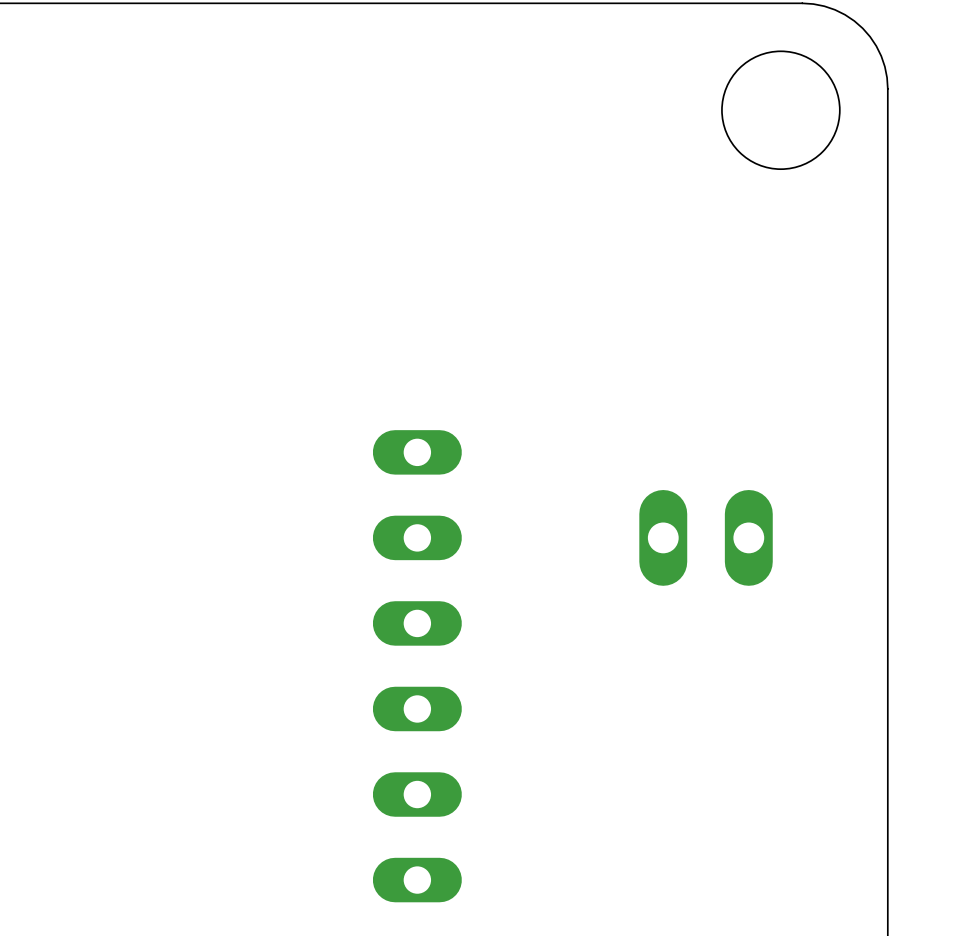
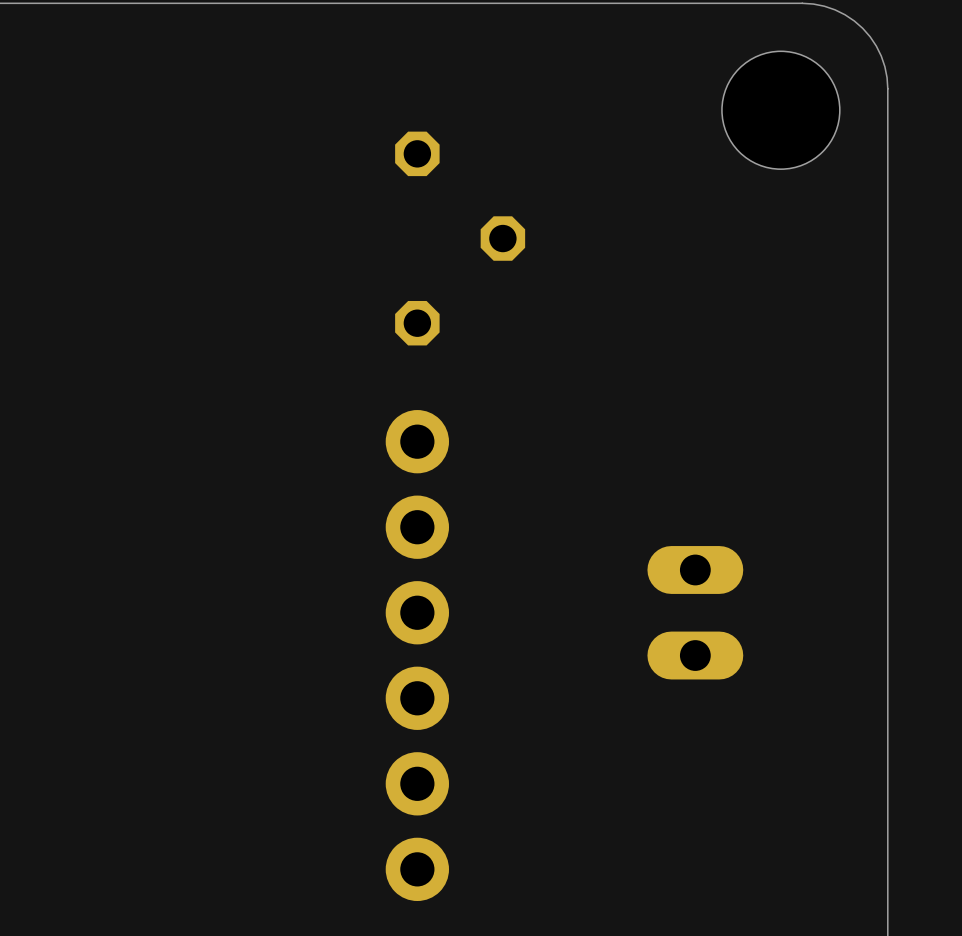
part: none -> (460, 238)
part footprint: [372, 430, 462, 903] -> [385, 410, 450, 902]
part rotation: 0° (706, 537) -> 90° clockwise (695, 612)

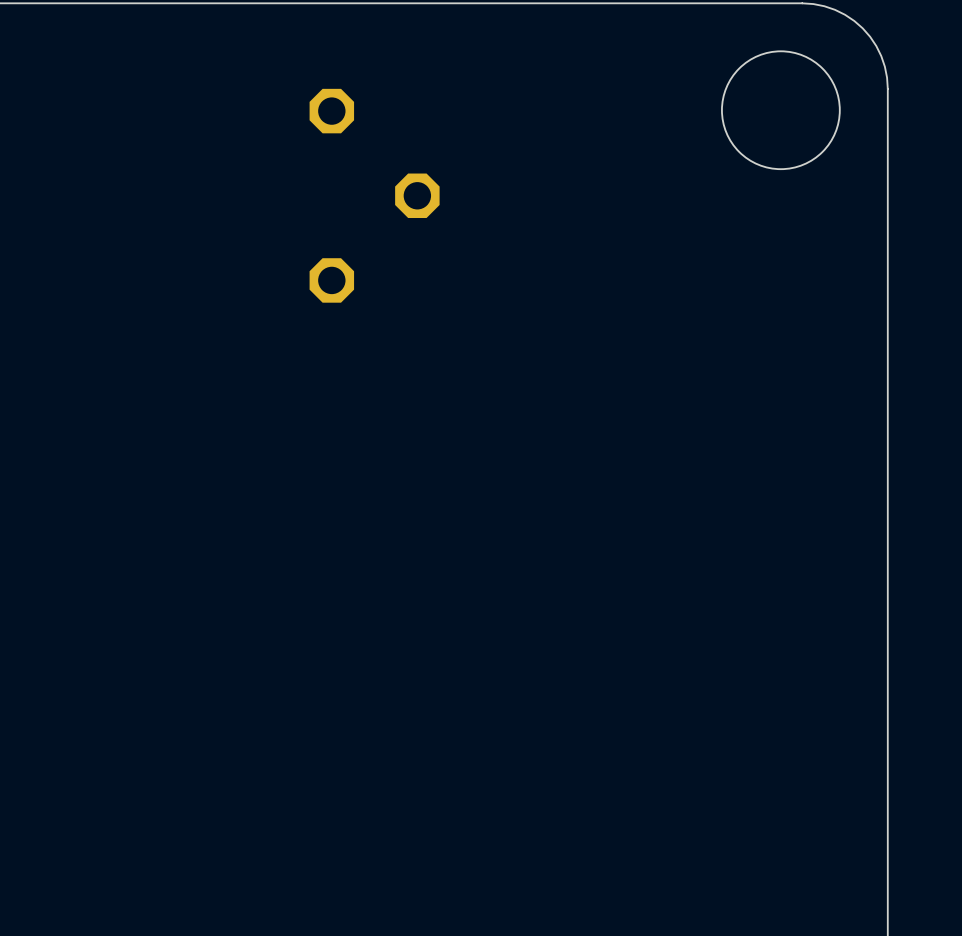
part position: (460, 238) -> (374, 195)
part: (695, 612) -> none
part: (417, 655) -> none

